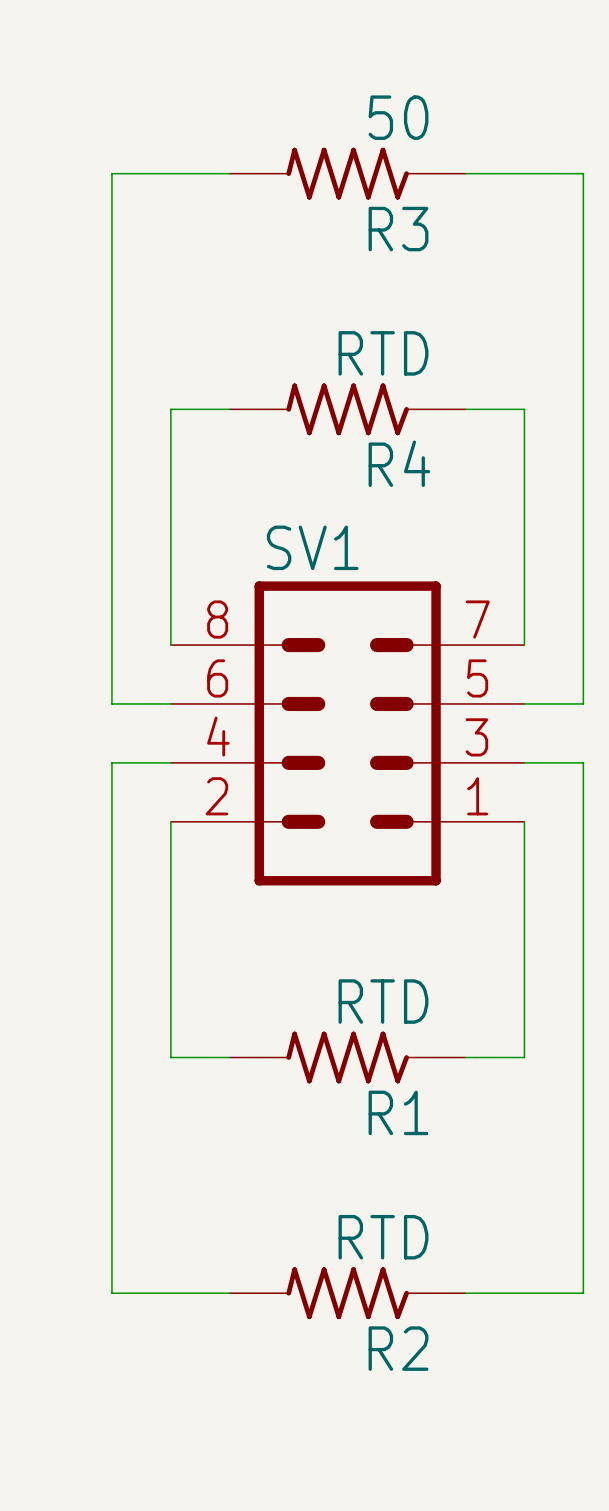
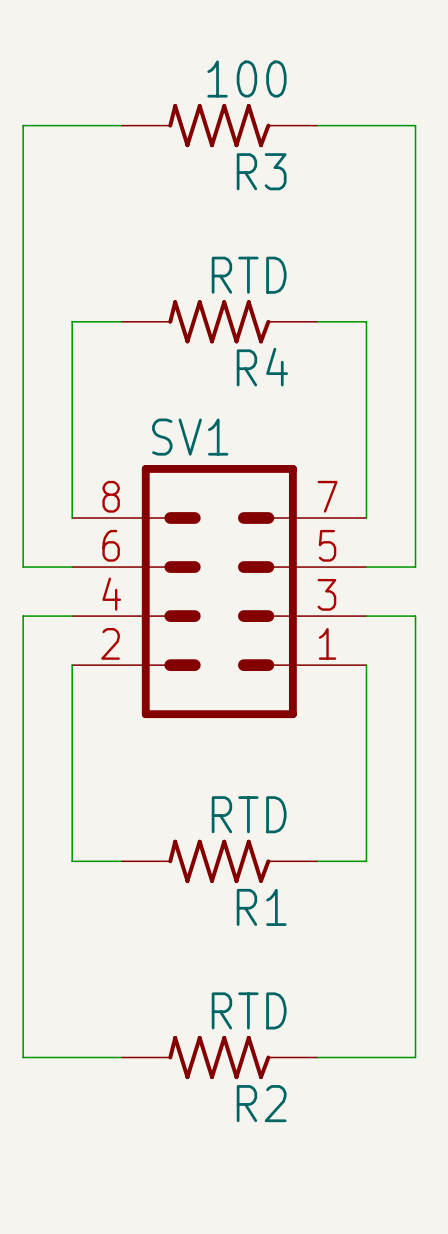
R3 value: 50 (398, 117) -> 100 (246, 79)

